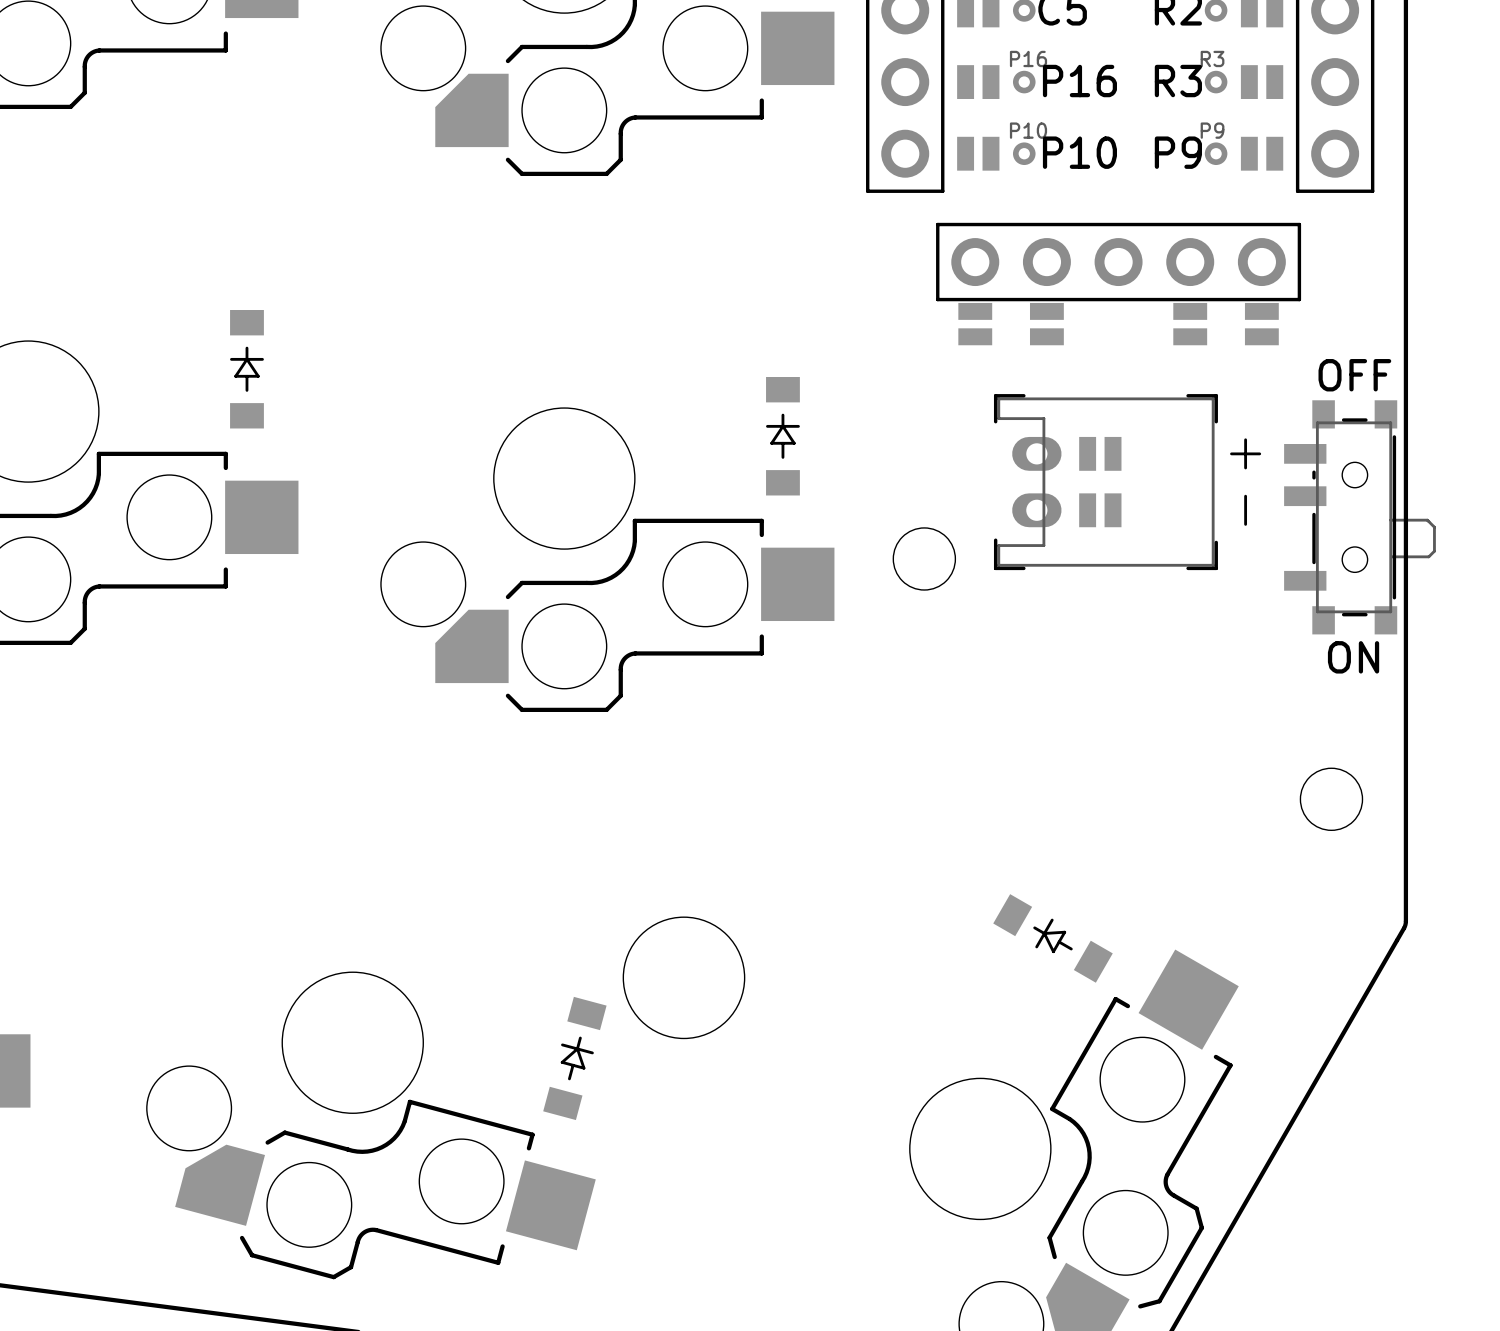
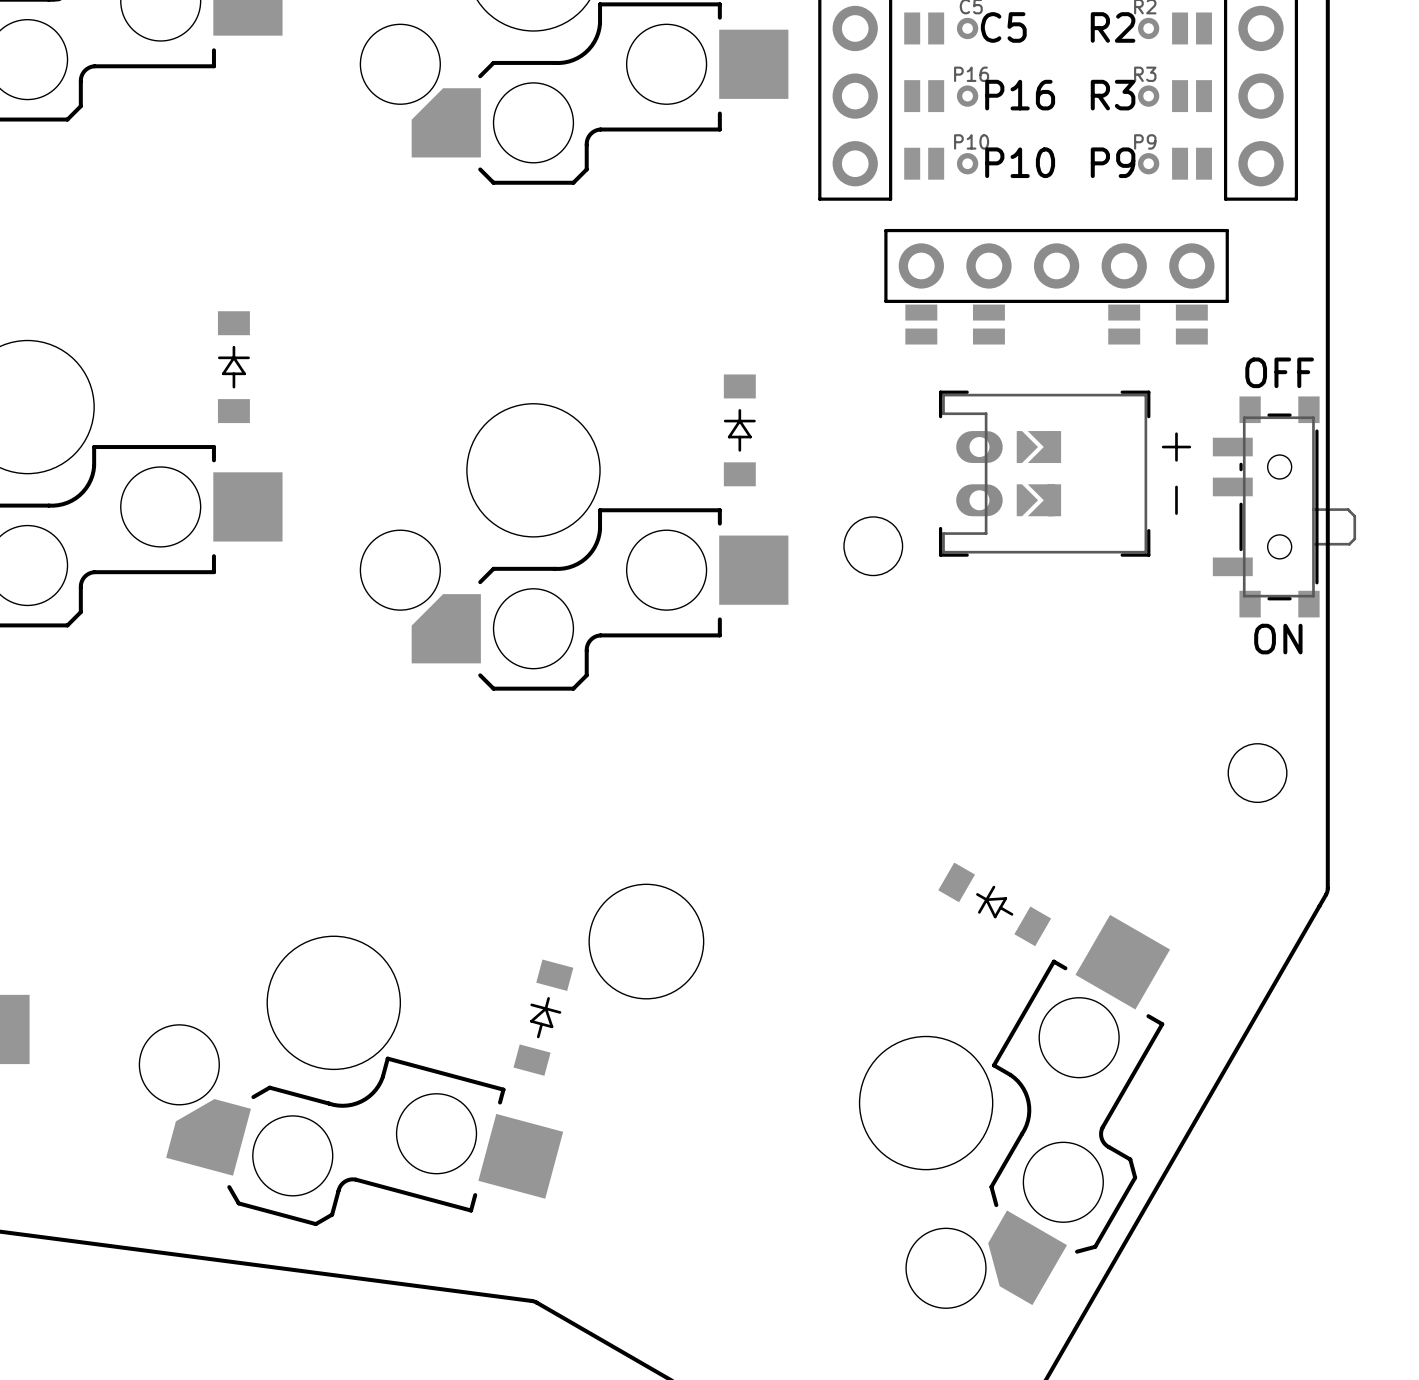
part footprint: [993, 394, 1262, 571] -> [938, 390, 1192, 557]

